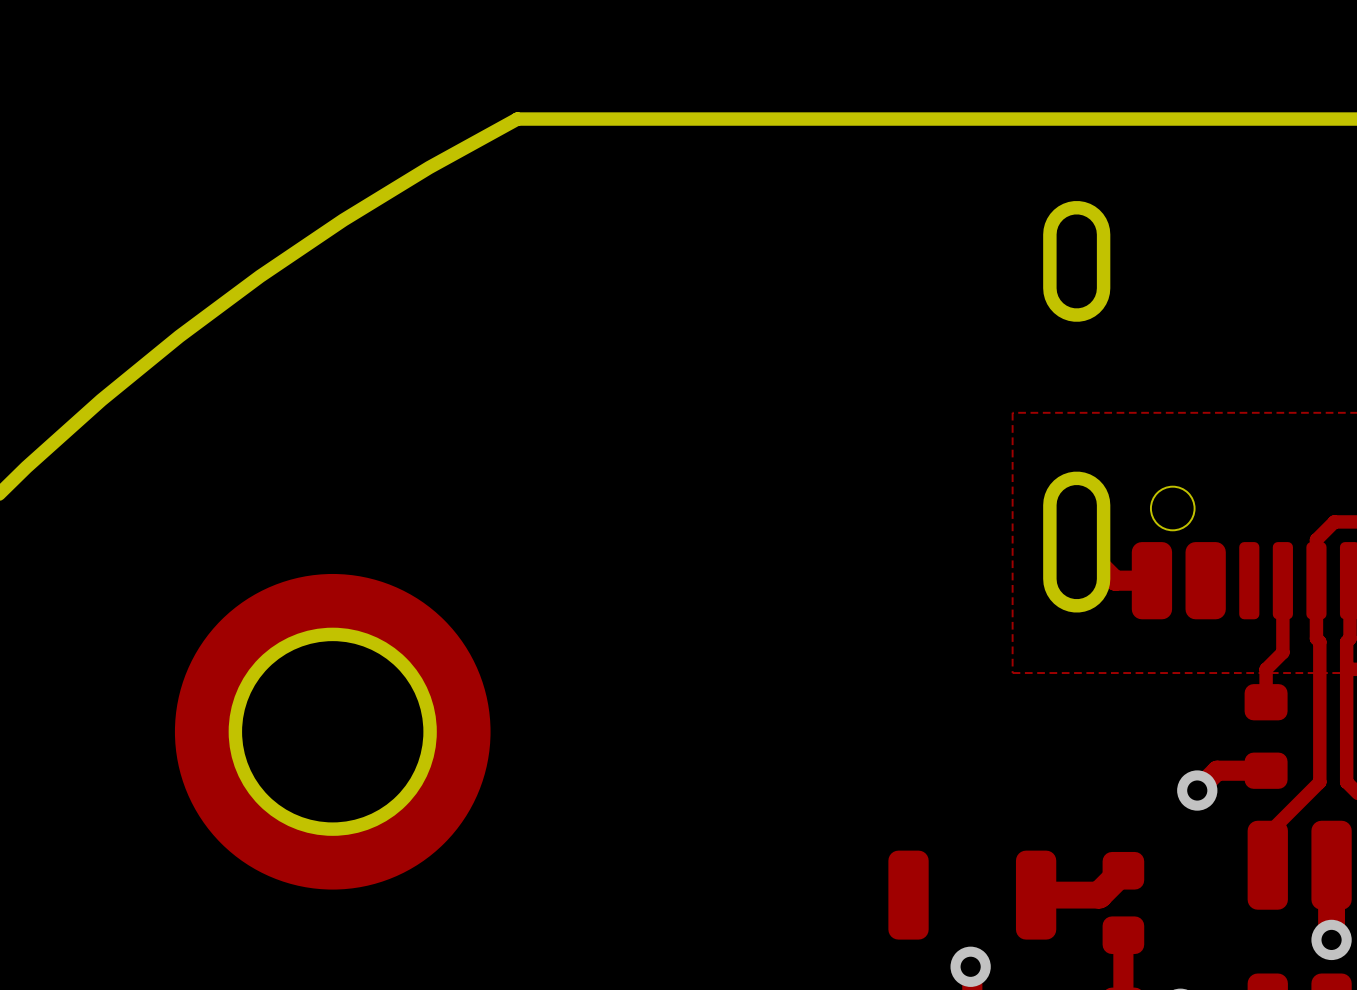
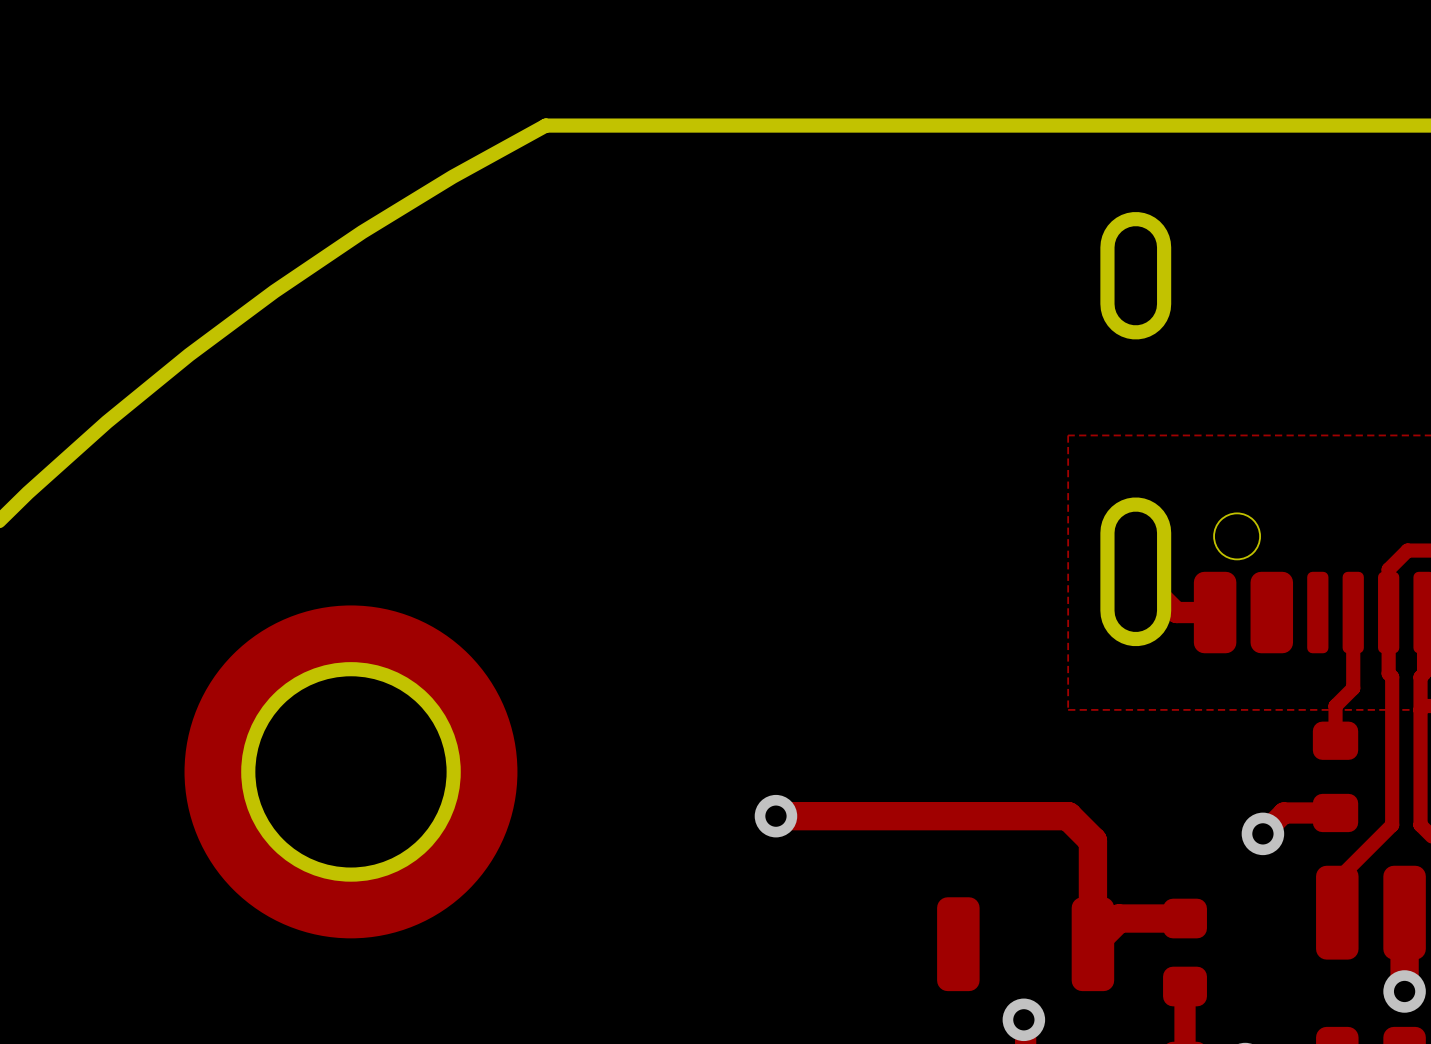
via: none -> (775, 816)
top track: (1123, 870) (1099, 895) (1036, 895) -> (1185, 918) (1118, 918) (1092, 944) (1092, 840) (1068, 816) (775, 816)

